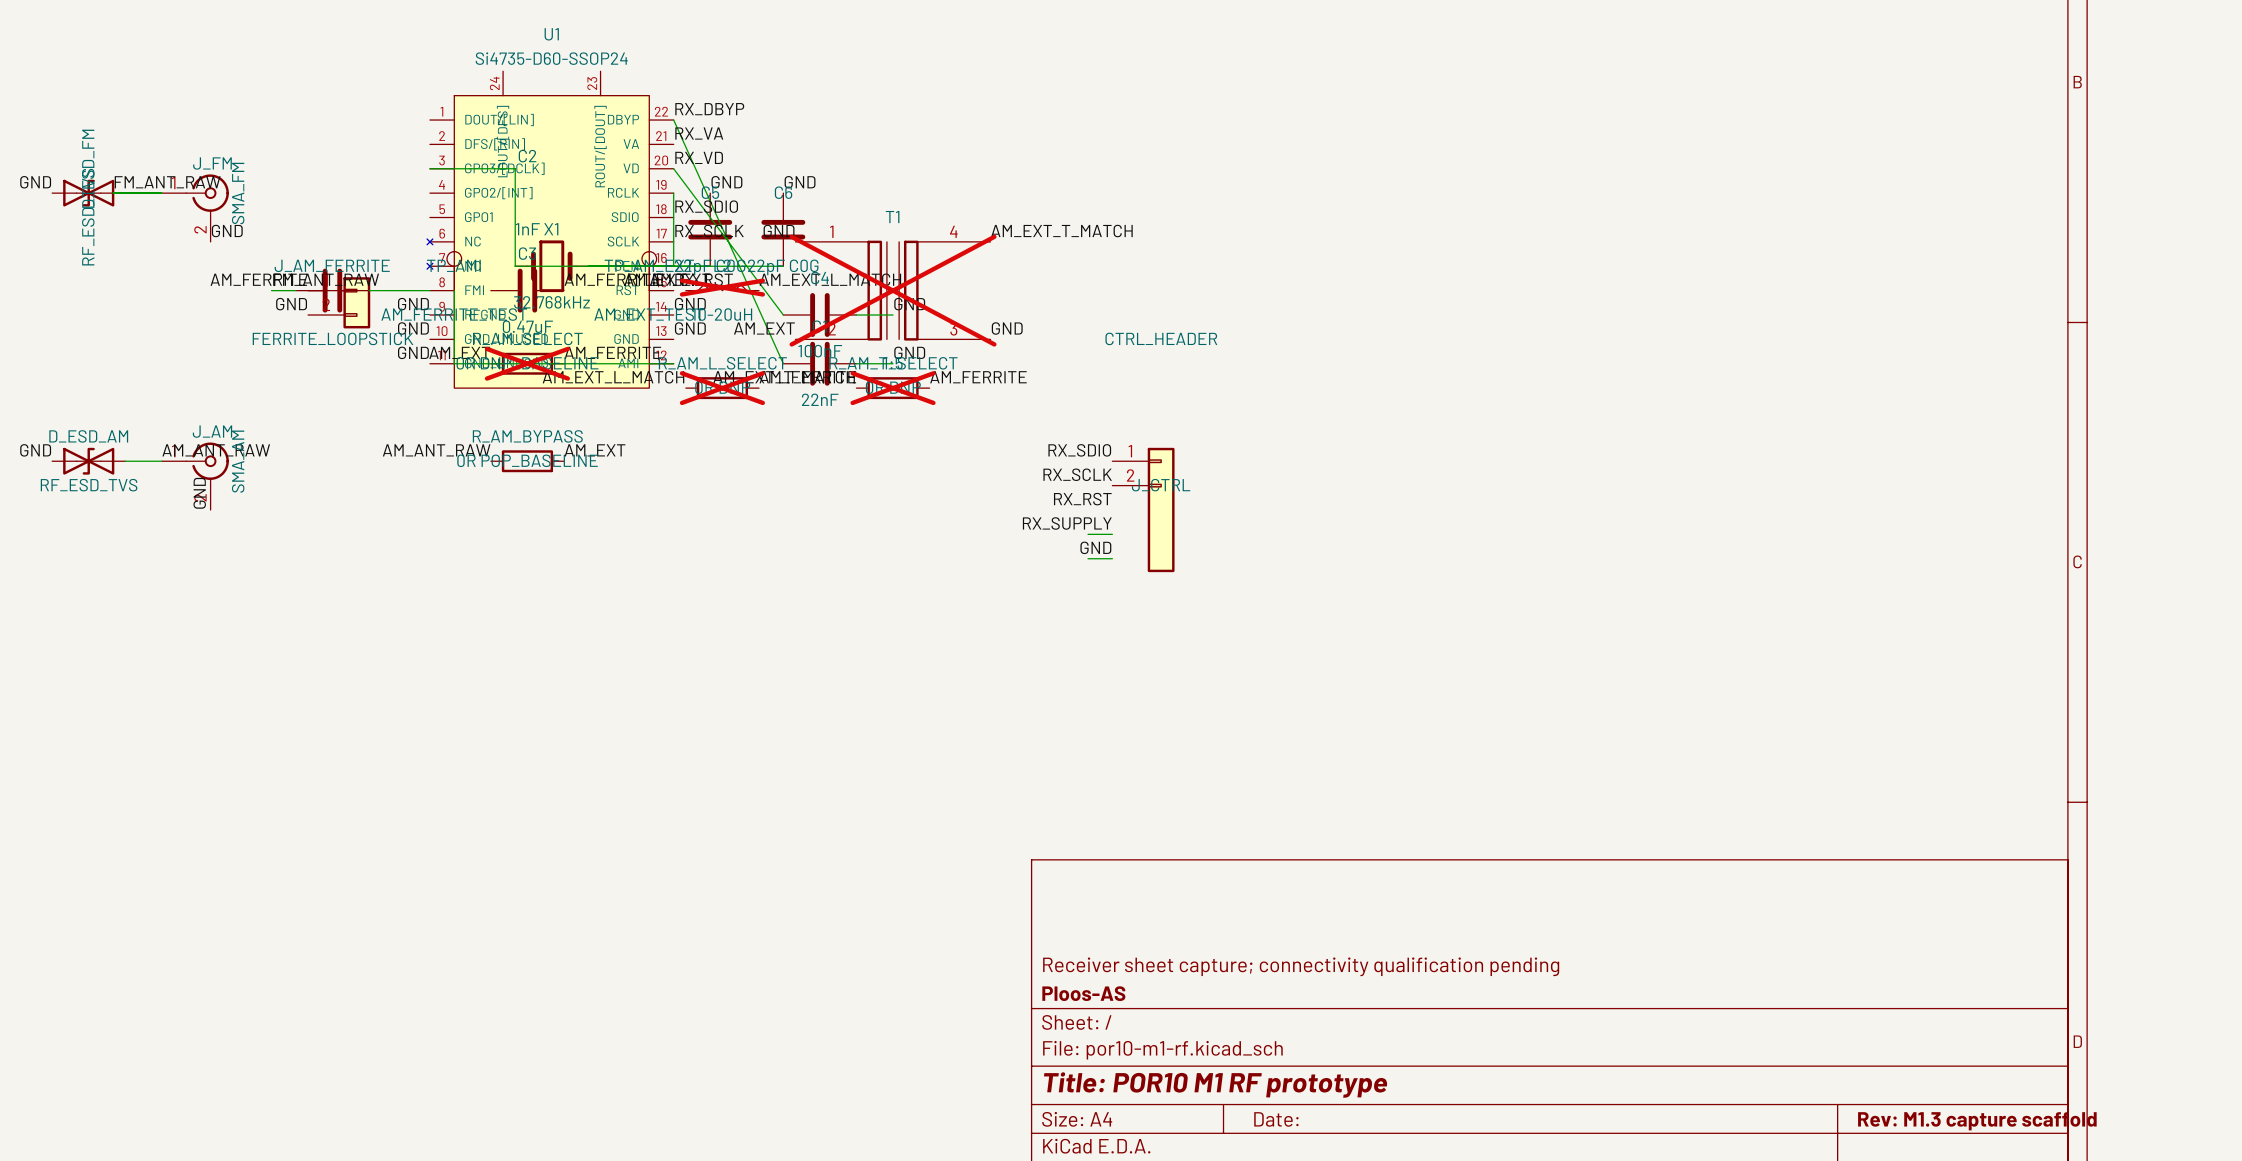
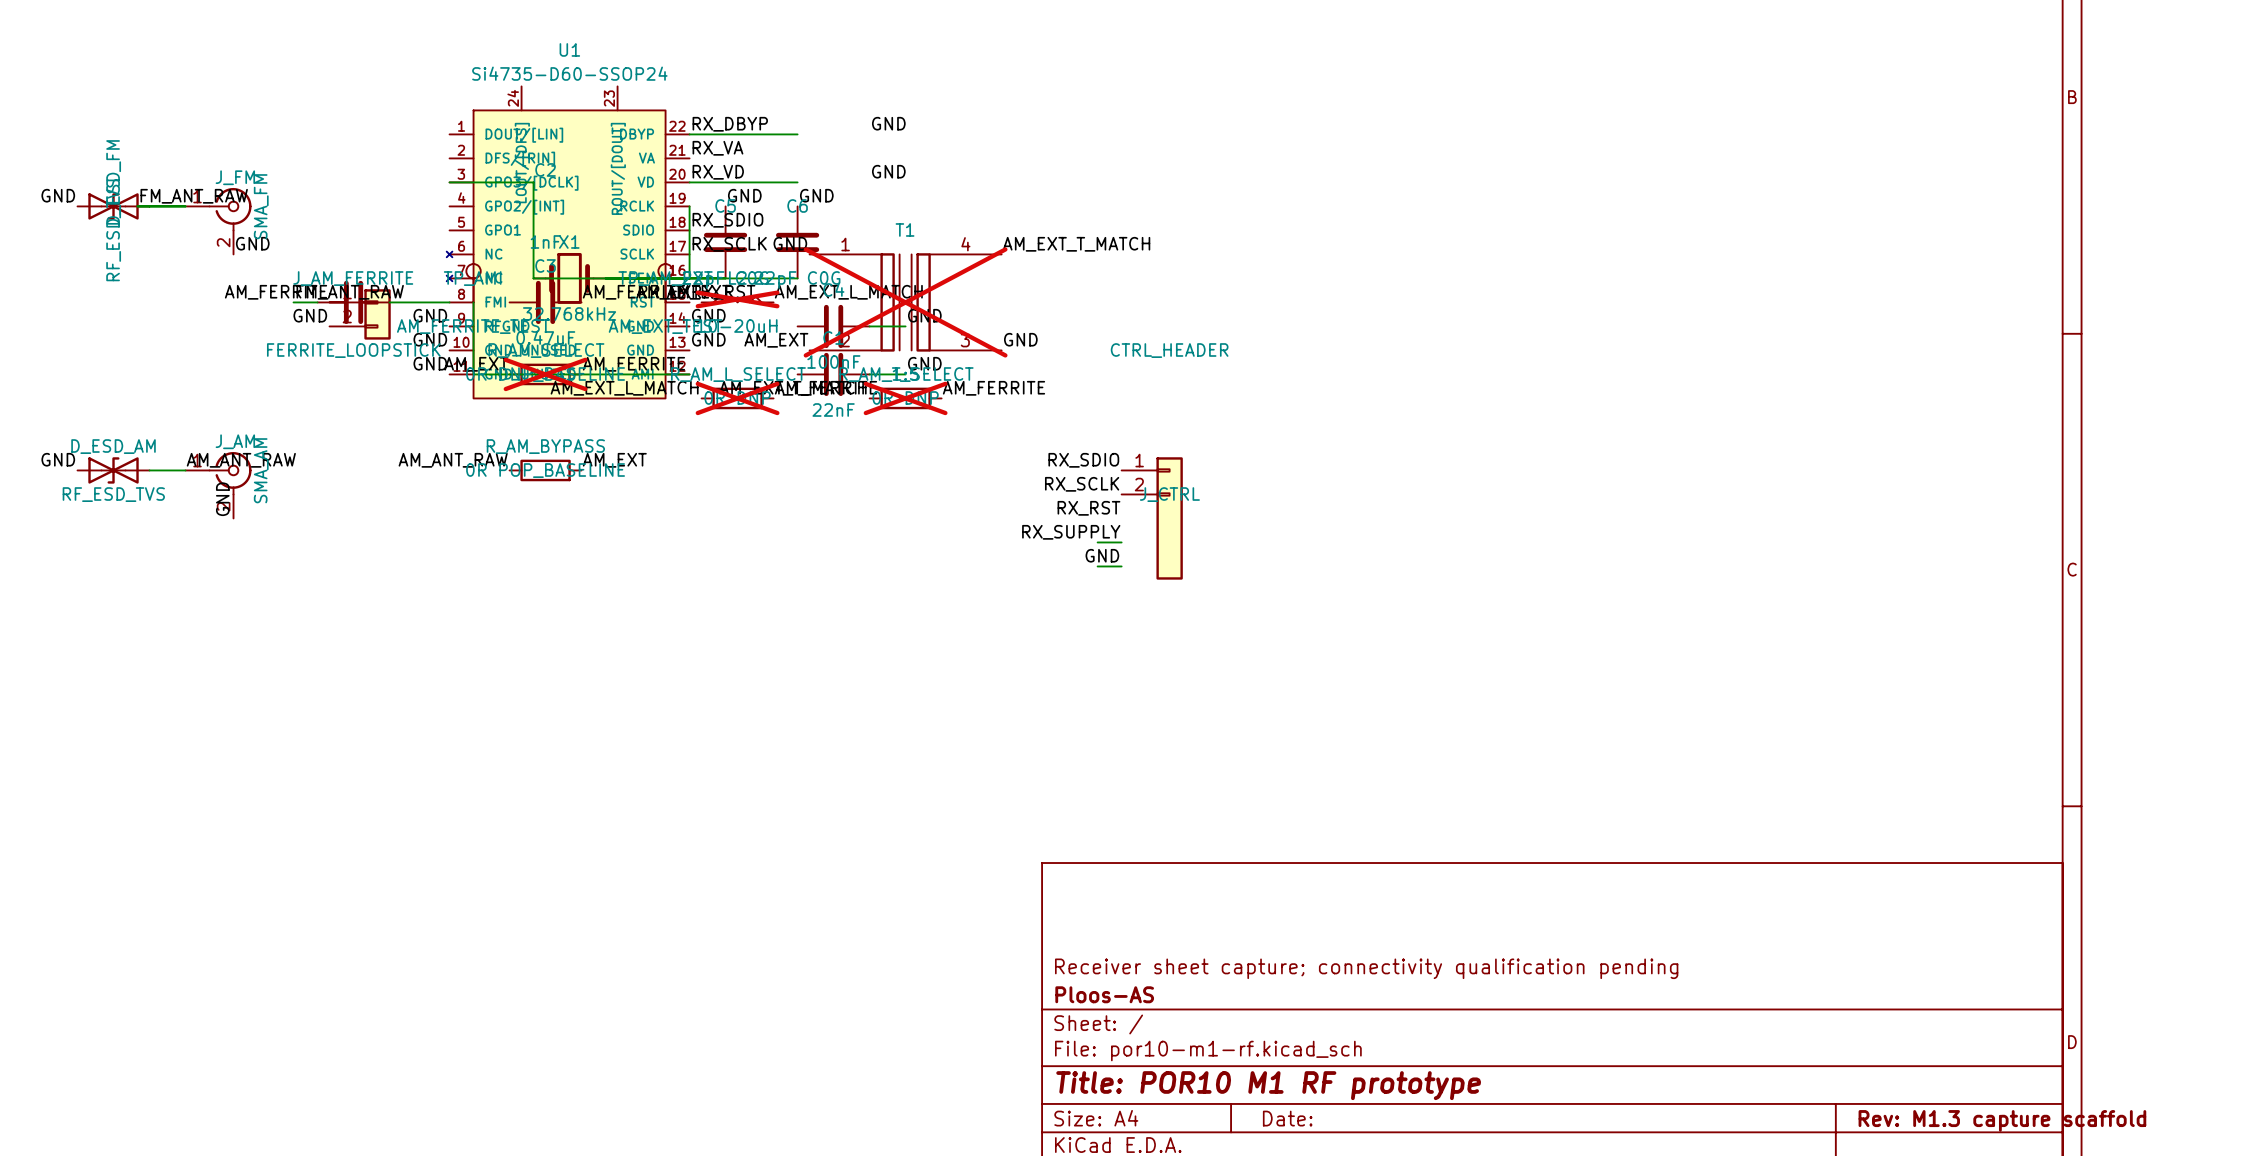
label: none -> GND (888, 123)
wire: (673, 120) (783, 363) -> (689, 134) (797, 134)
label: none -> GND (888, 171)
wire: (673, 168) (783, 315) -> (689, 182) (797, 182)

